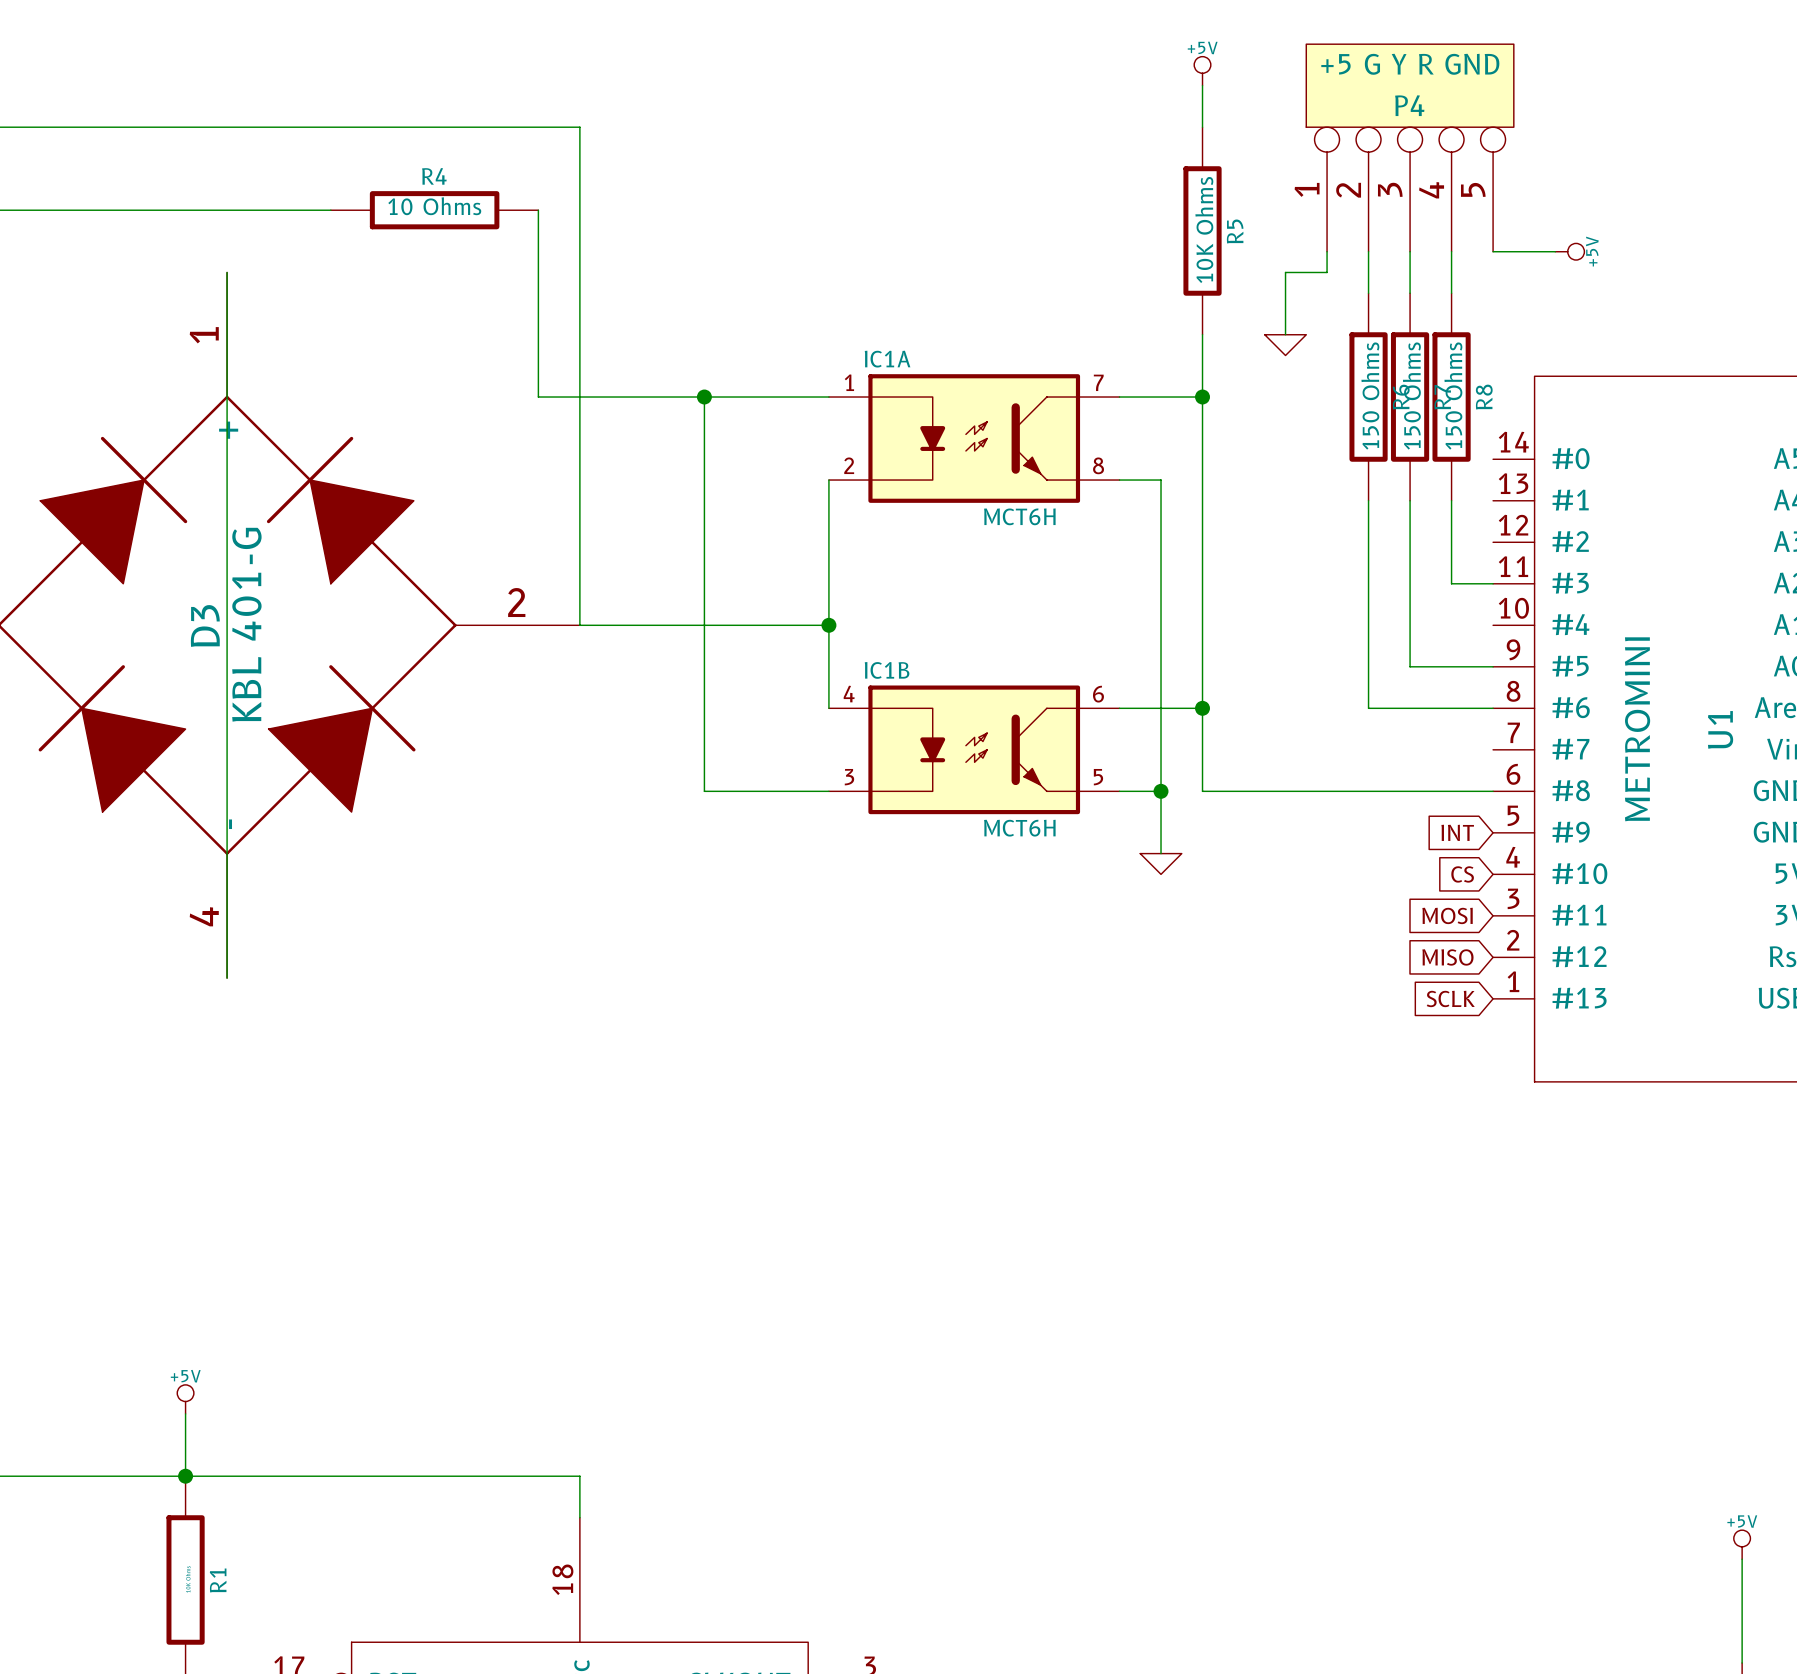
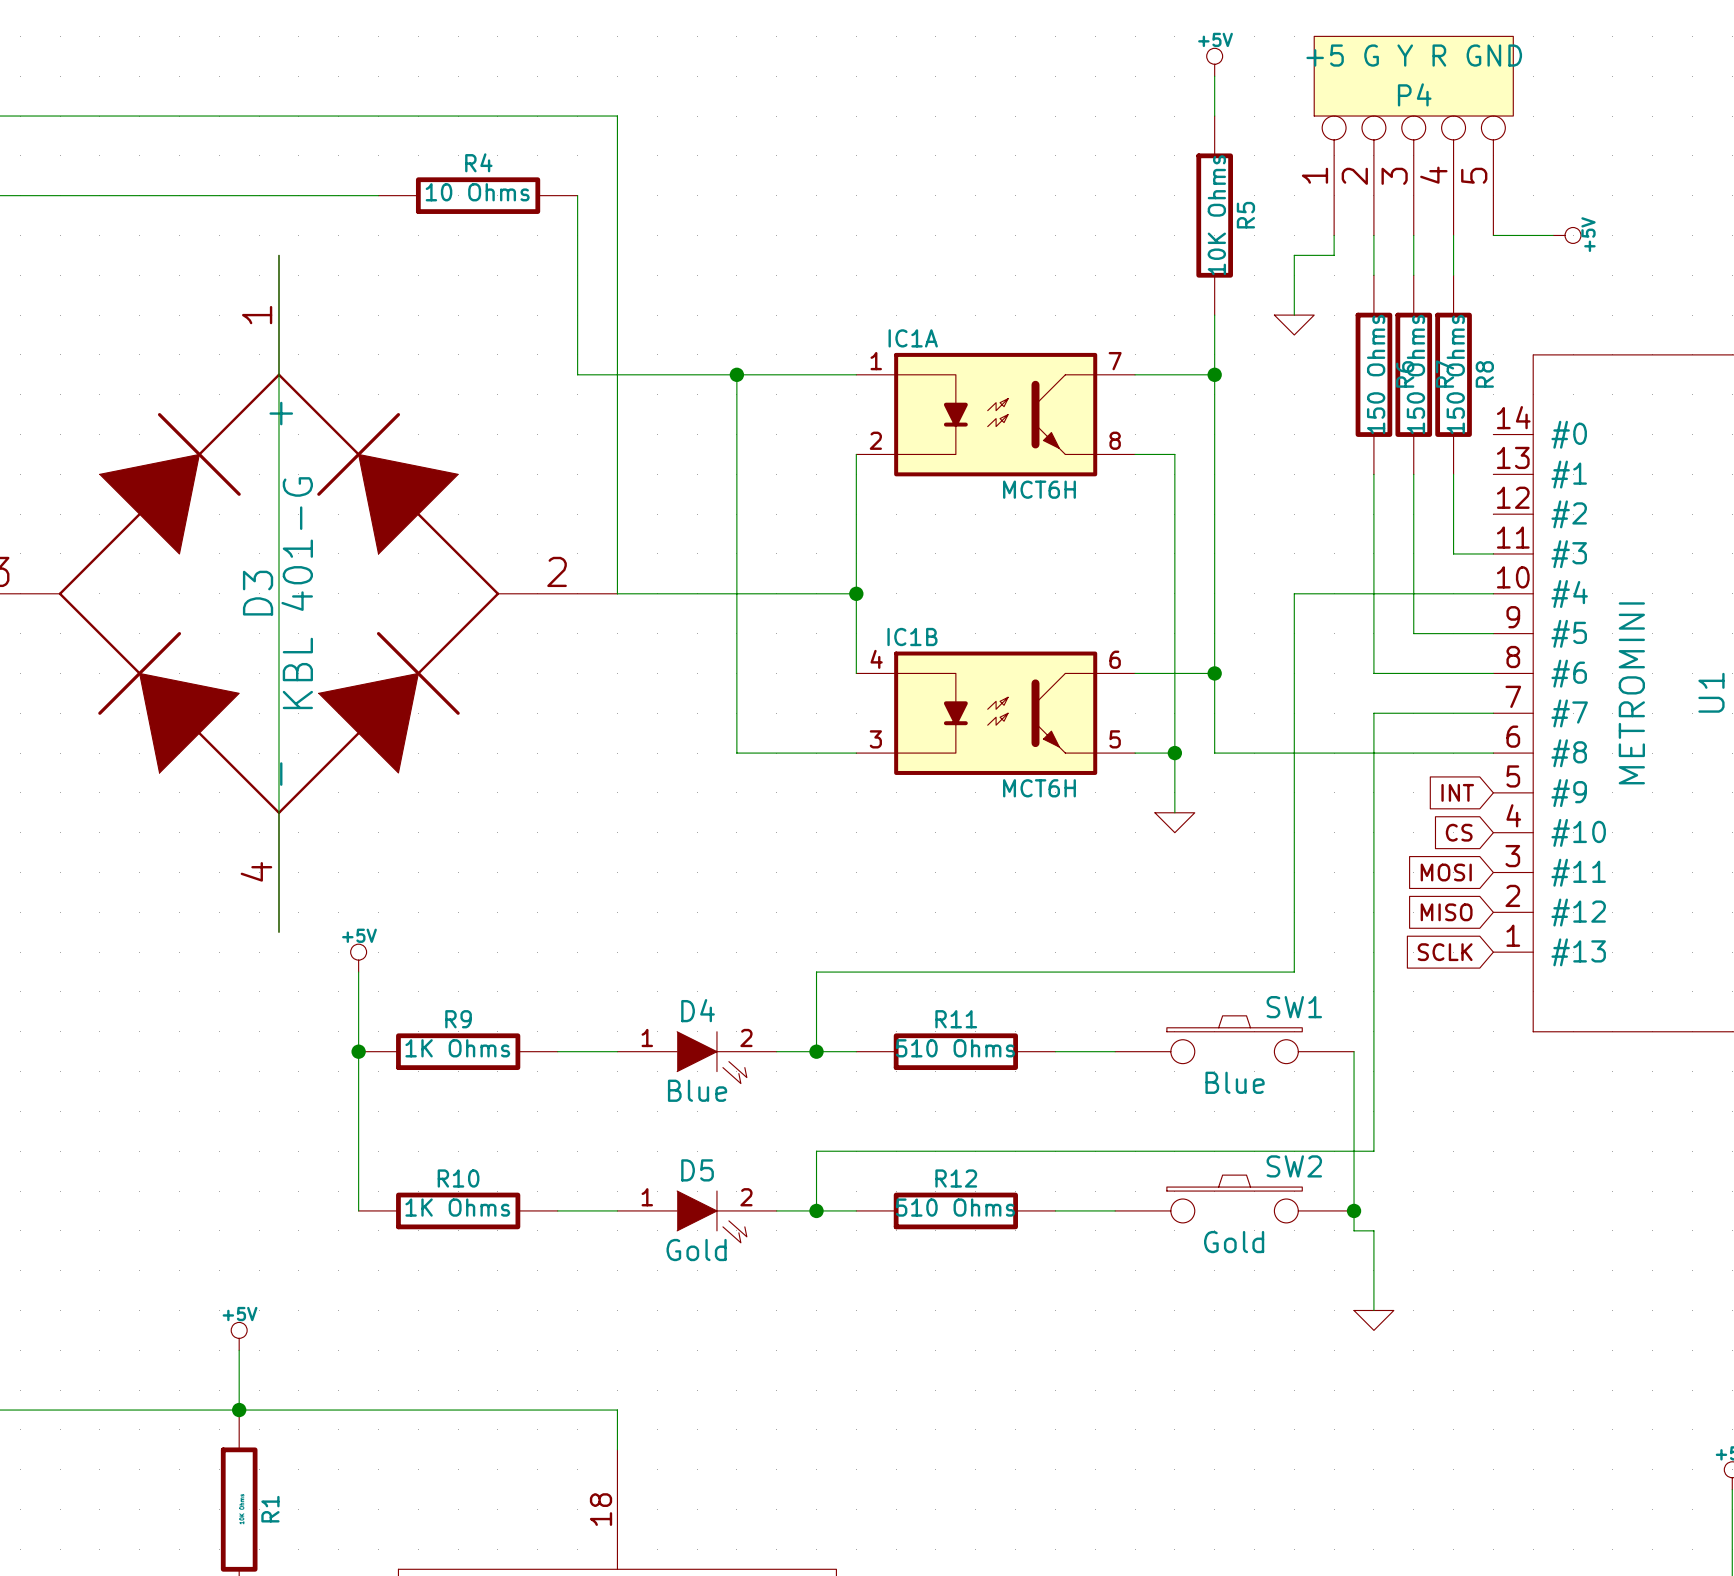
wire: none -> (1493, 593) (1294, 593) (1294, 972) (816, 972) (816, 1051)
wire: none -> (1493, 713) (1373, 713) (1373, 1151) (816, 1151) (816, 1210)
power symbol: none -> +5V (358, 958)
wire: none -> (358, 972) (358, 1210)
SW1: none -> Blue (1234, 1039)
junction: none -> (358, 1051)
R9: none -> 1K Ohms (458, 1051)
wire: none -> (557, 1051) (617, 1051)
wire: none -> (776, 1051) (856, 1051)
junction: none -> (816, 1051)
R11: none -> 510 Ohms (955, 1051)
wire: none -> (1055, 1051) (1115, 1051)
wire: none -> (1354, 1051) (1354, 1230) (1373, 1230) (1373, 1310)
D4: none -> Blue (697, 1057)
SW2: none -> Gold (1234, 1199)
R10: none -> 1K Ohms (458, 1210)
wire: none -> (557, 1210) (617, 1210)
wire: none -> (776, 1210) (856, 1210)
junction: none -> (816, 1210)
R12: none -> 510 Ohms (955, 1210)
wire: none -> (1055, 1210) (1115, 1210)
junction: none -> (1354, 1210)
D5: none -> Gold (697, 1216)
power symbol: none -> (1373, 1320)

